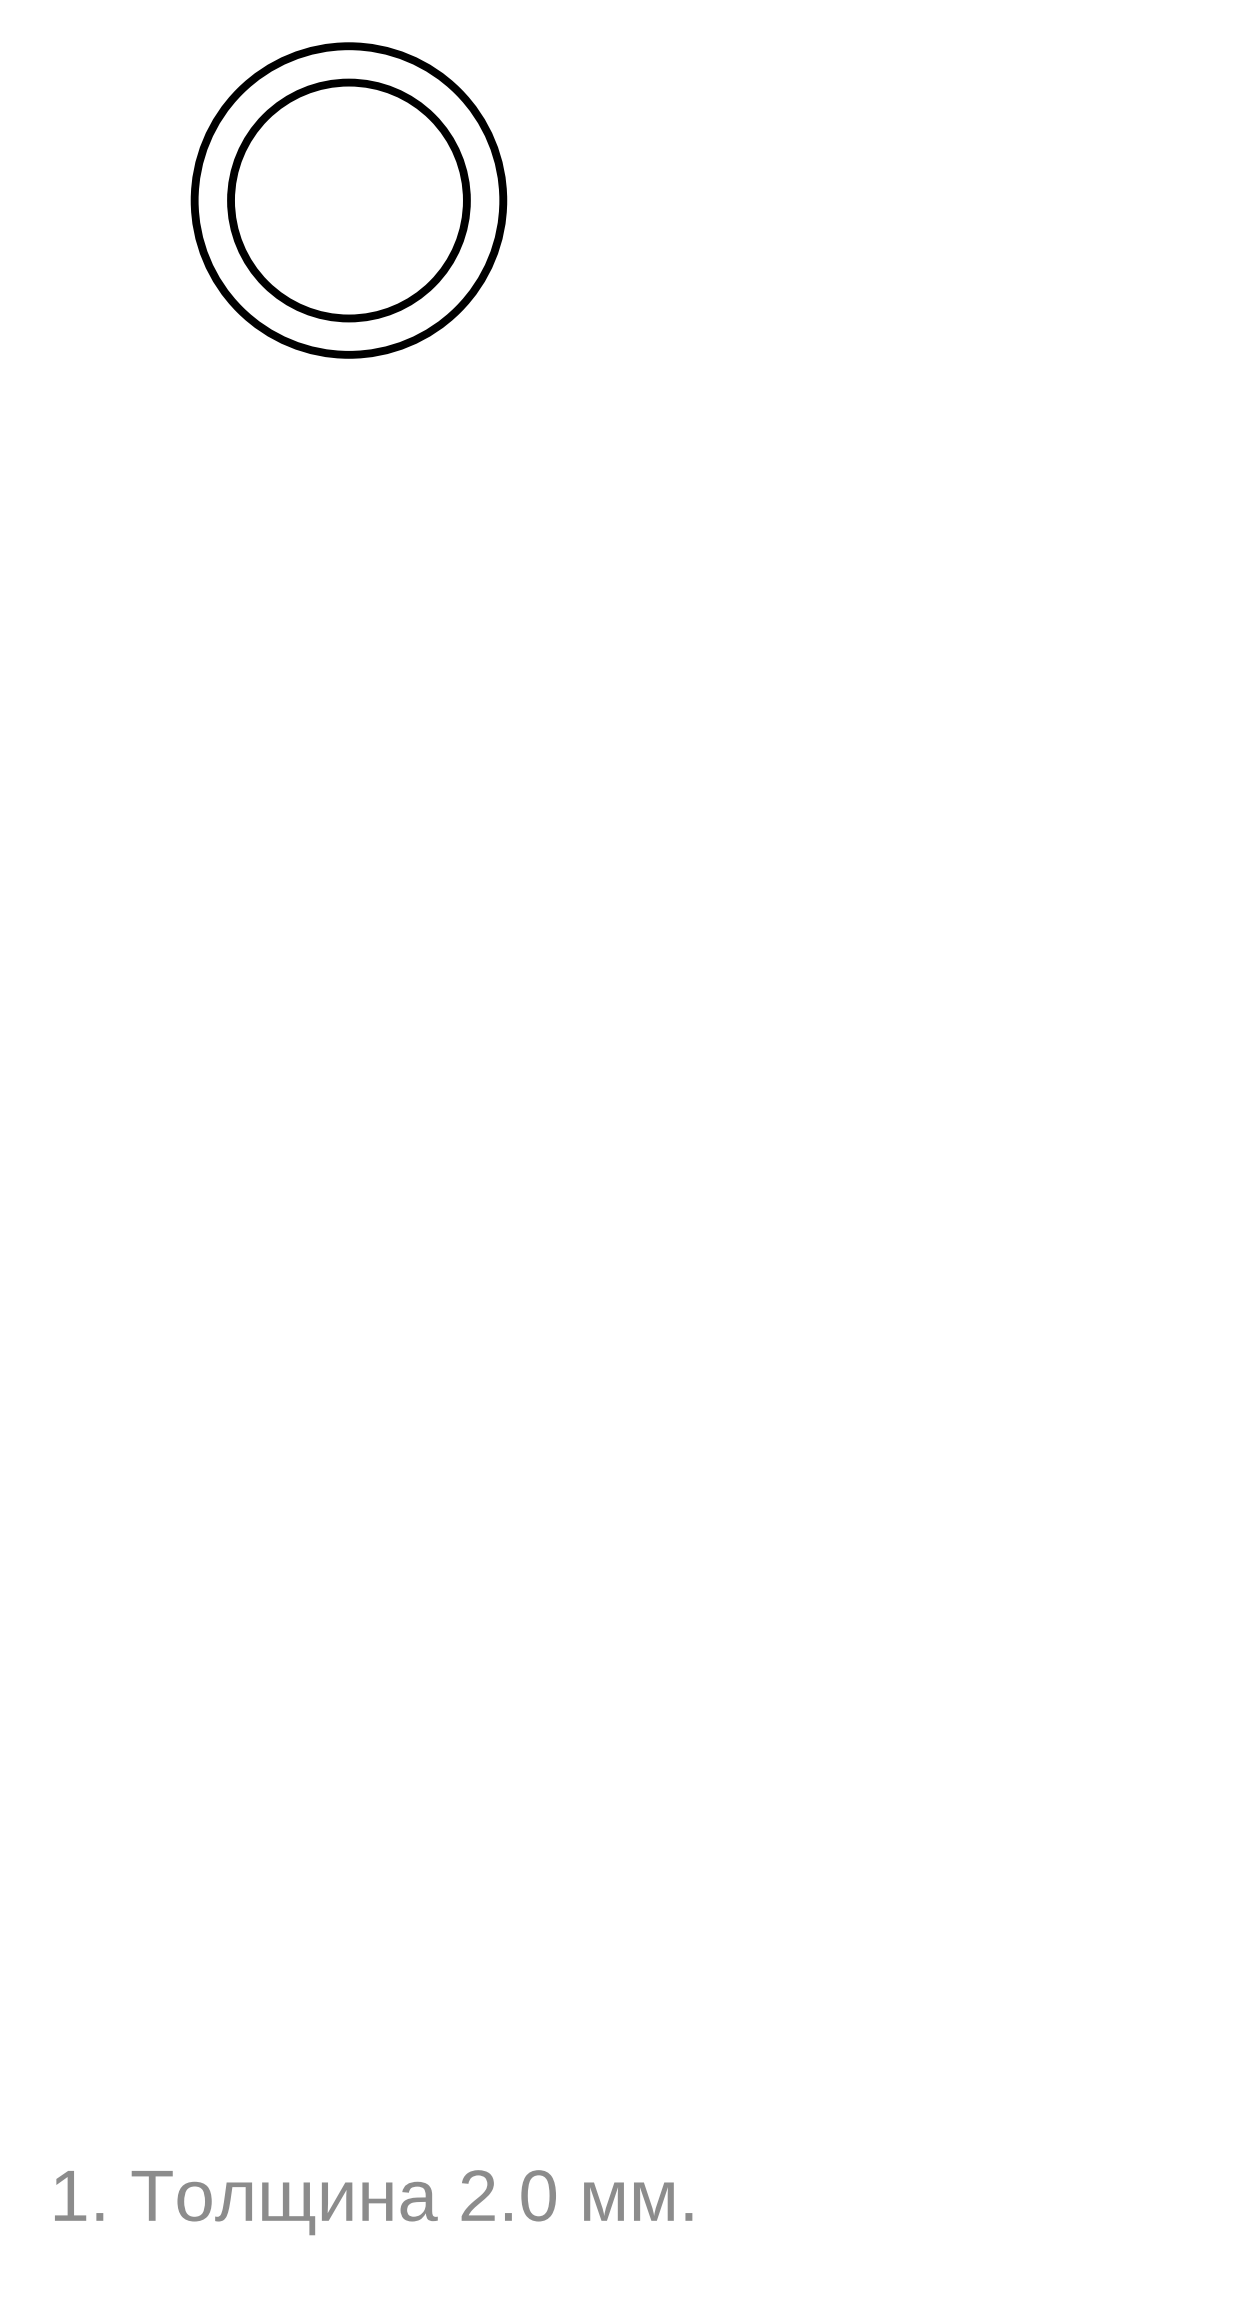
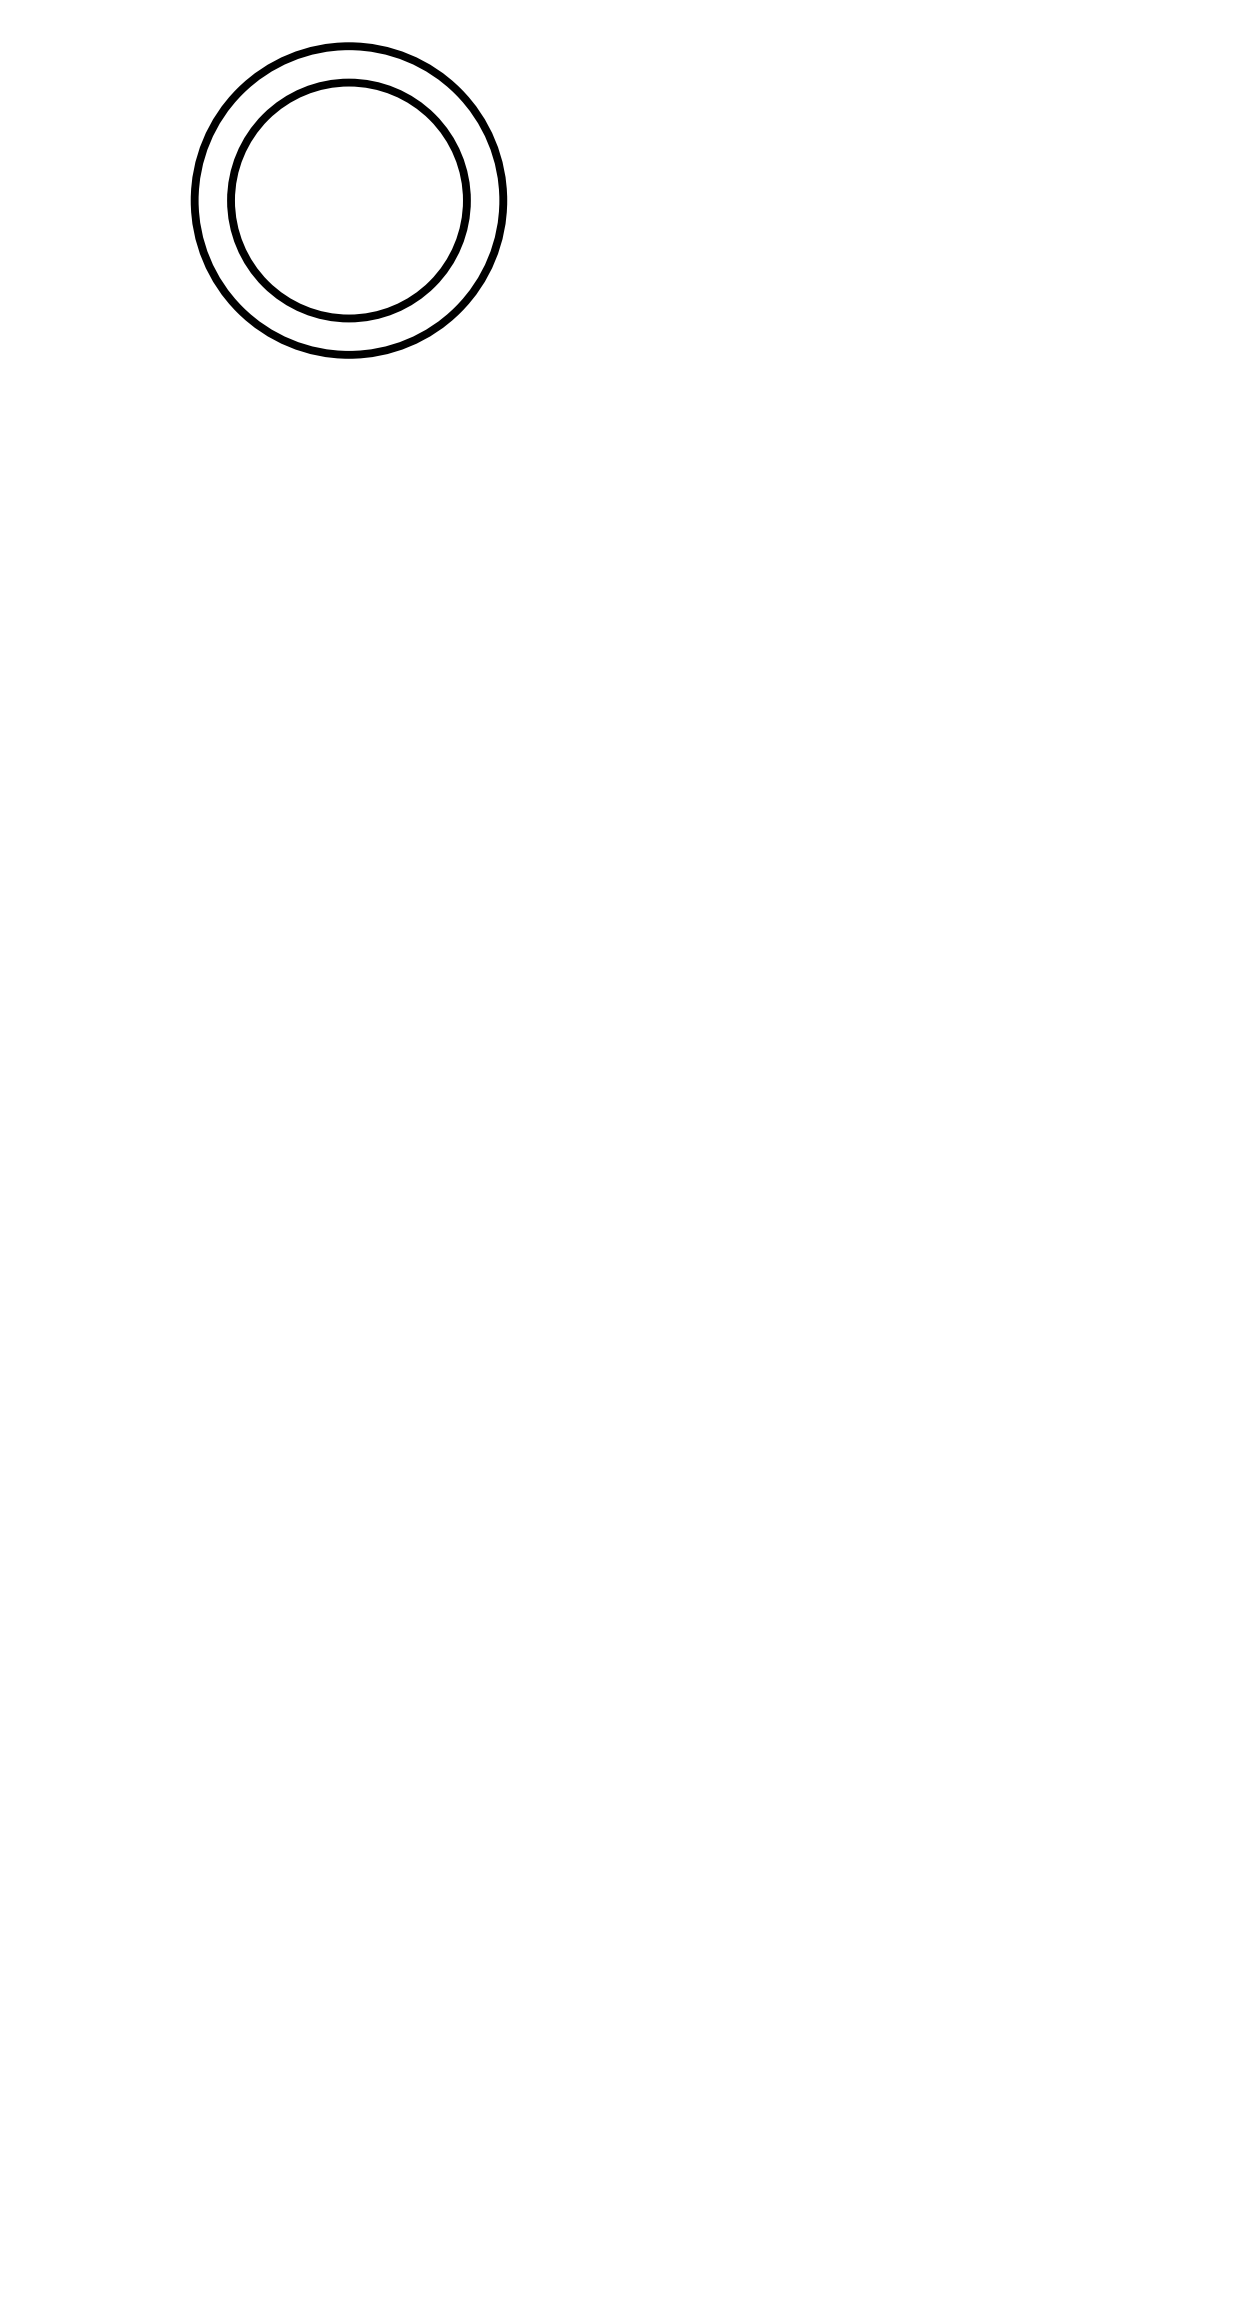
text: 1. Толщина 2.0 мм. (373, 2202) -> none

